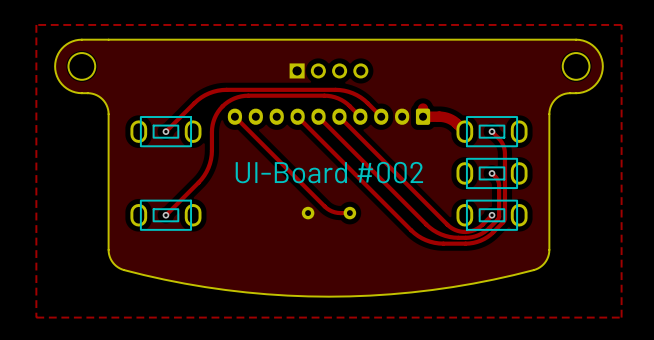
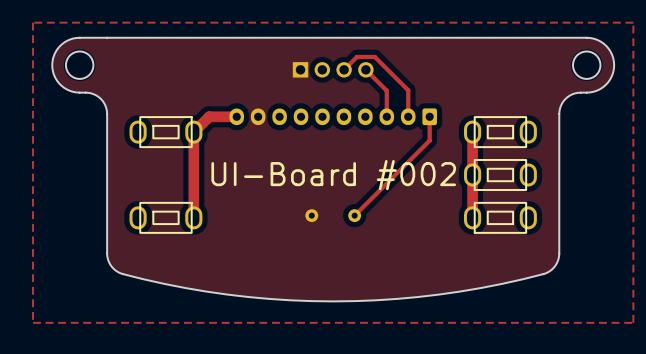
track: none -> (344, 69) (356, 56) (374, 56) (408, 90) (408, 116)
track: (423, 108) (425, 116) (449, 118) (464, 131) -> (472, 217) (472, 132)
track: (234, 116) (326, 208) (334, 212) (349, 213) -> (236, 116) (209, 116) (193, 132) (193, 217)
track: (297, 116) (414, 233) (426, 240) (438, 243) (477, 241) (490, 234) (504, 220) (504, 150) (502, 142) (492, 131) -> none
track: (318, 116) (426, 224) (445, 235) (458, 237) (475, 236) (486, 230) (498, 219) (499, 184) (492, 173) -> none
track: (339, 116) (451, 227) (460, 231) (471, 231) (480, 226) (492, 215) -> none
track: (360, 116) (344, 101) (327, 95) (248, 95) (231, 99) (220, 109) (213, 121) (211, 154) (206, 171) (198, 182) (165, 215) -> none
track: (381, 116) (360, 97) (344, 90) (222, 90) (201, 97) (165, 131) -> (386, 116) (386, 90) (365, 69)
track: none -> (429, 116) (429, 140) (354, 215)
via: (165, 131) -> none
via: (492, 131) -> none
via: (492, 173) -> none
via: (165, 215) -> none
via: (492, 215) -> none

